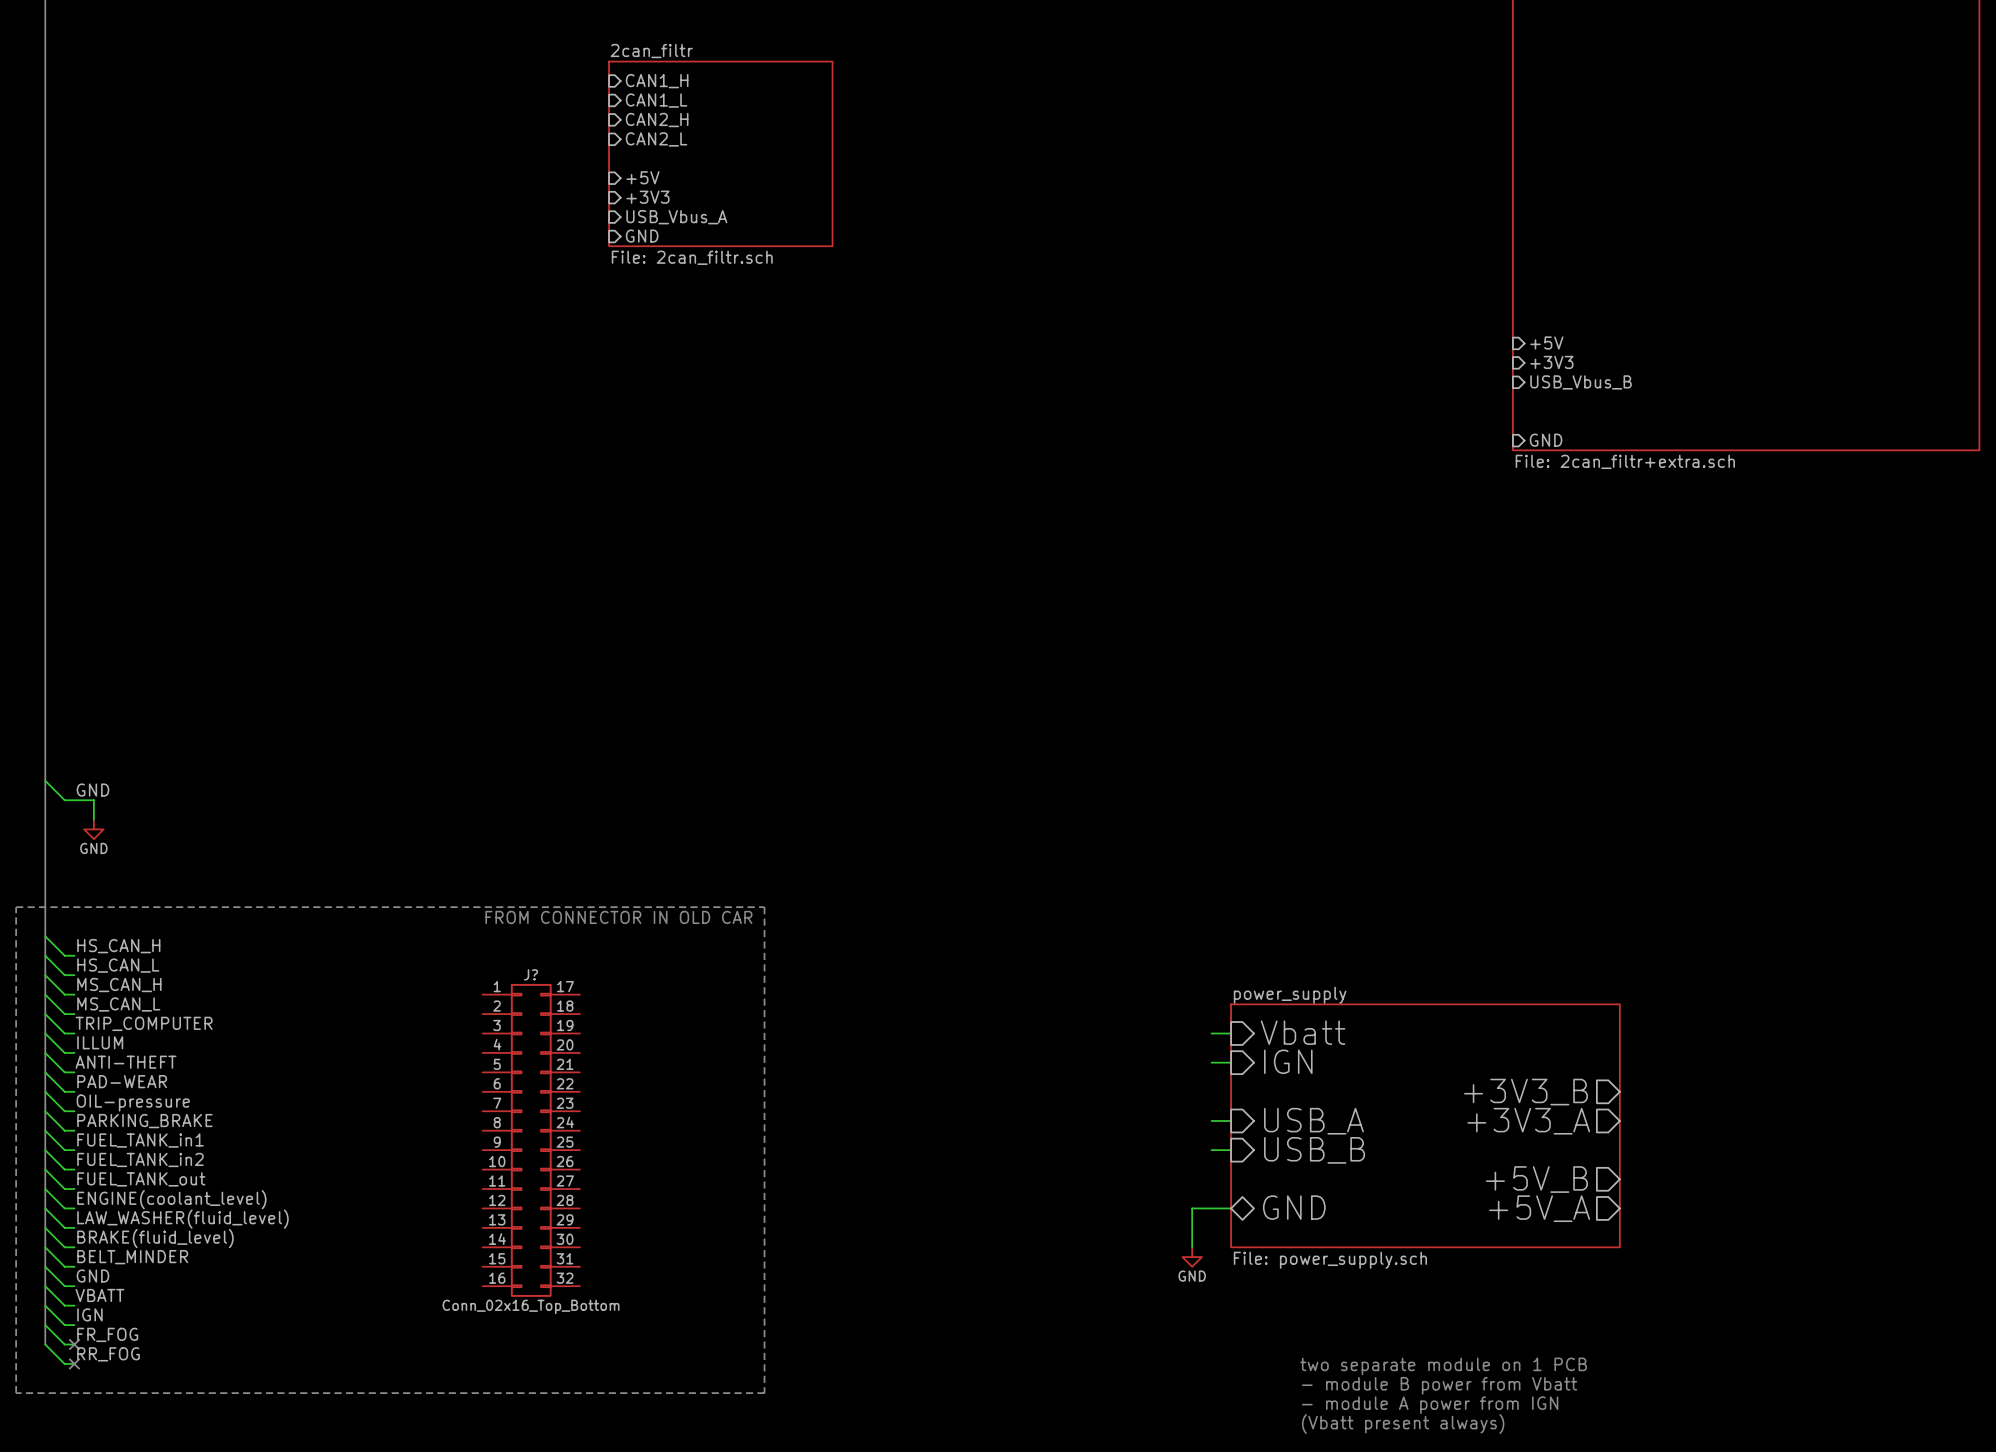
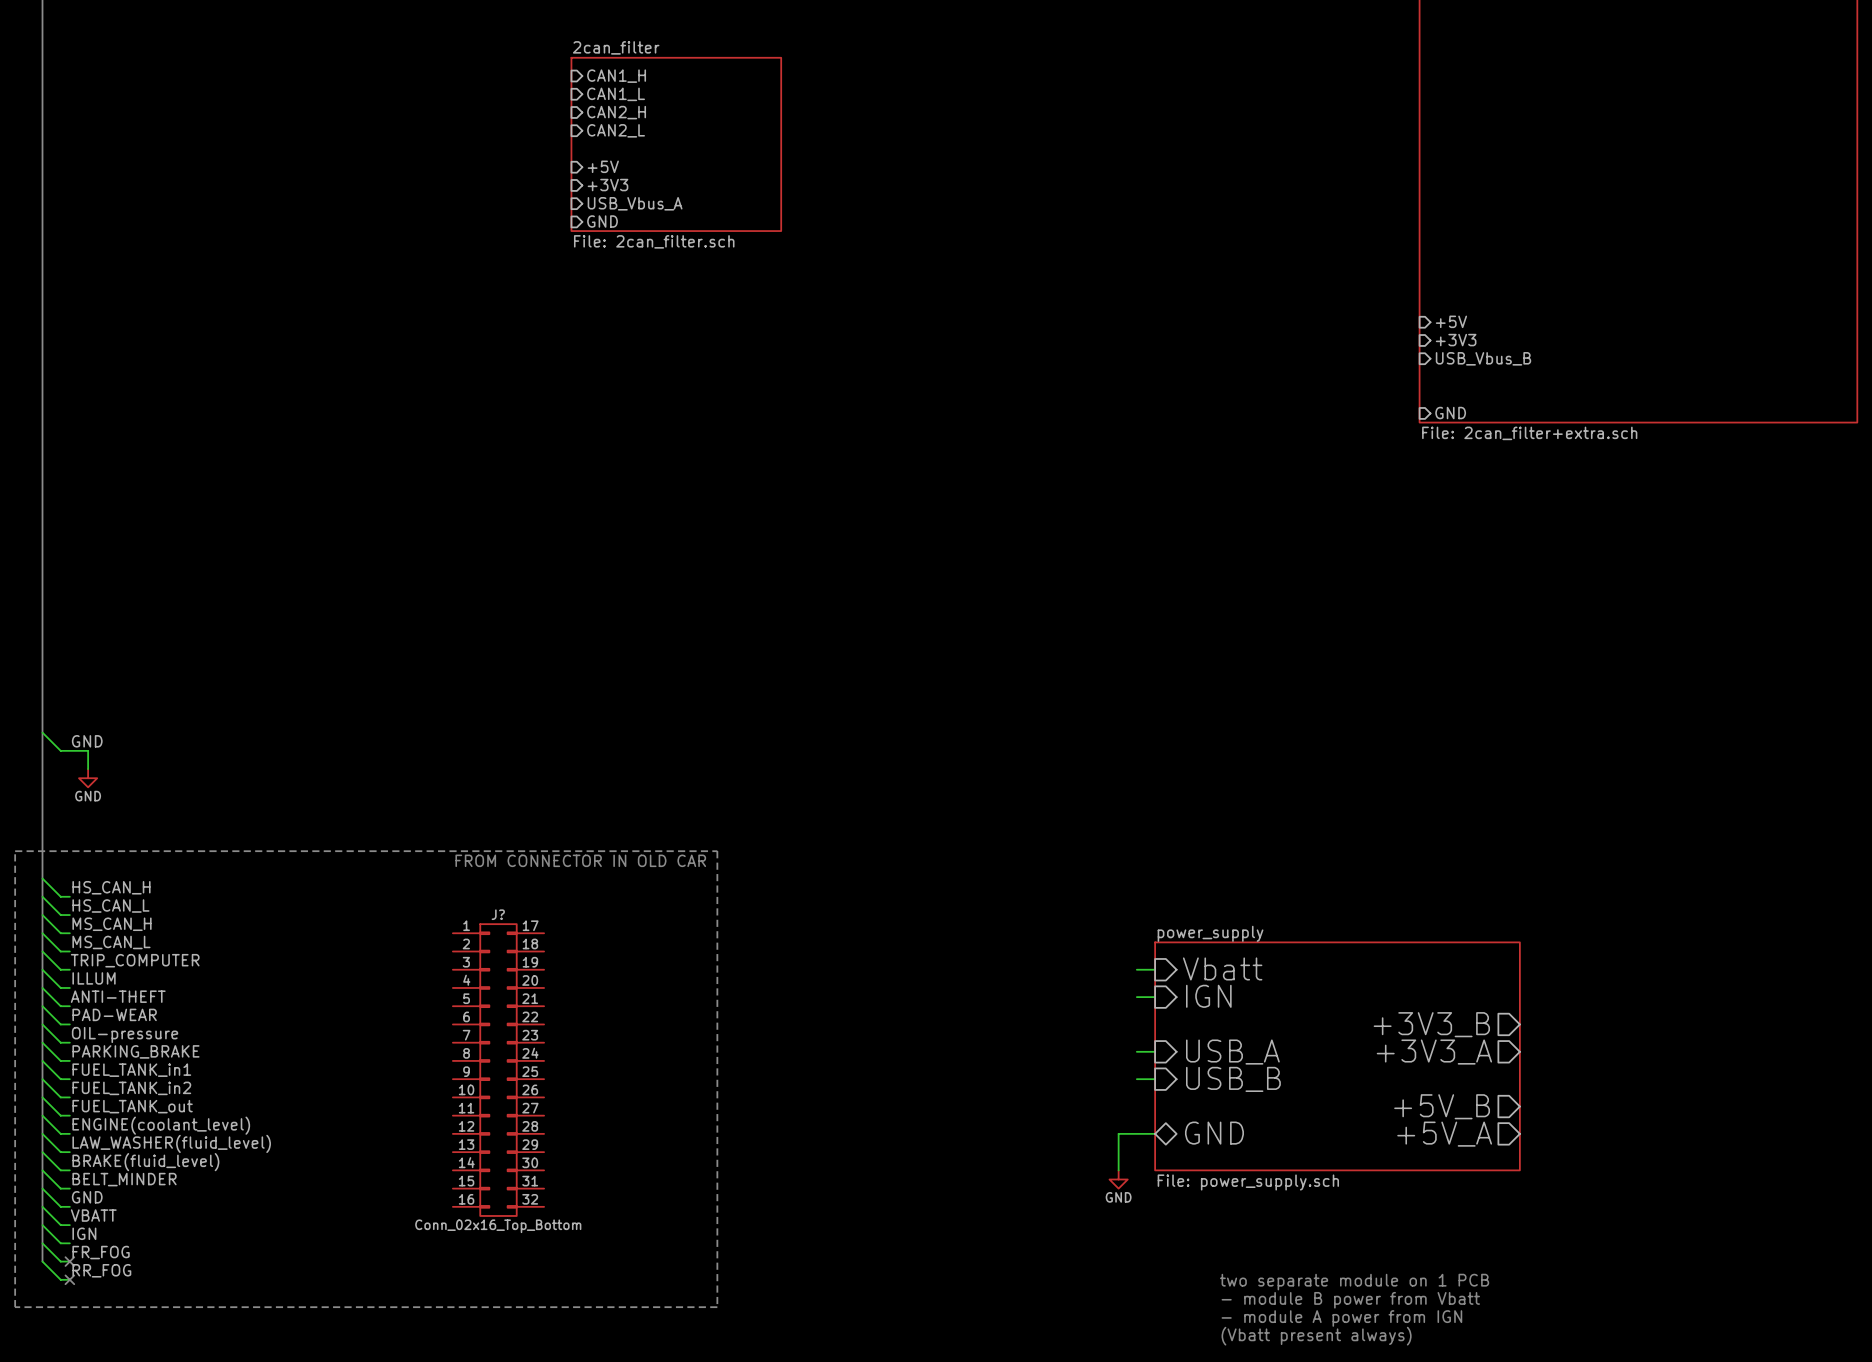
sheet 2can_filtr name: 2can_filtr (651, 51) -> 2can_filter (616, 47)
sheet 2can_filtr value: File: 2can_filtr.sch (692, 257) -> File: 2can_filter.sch (654, 241)
sheet value: File: 2can_filtr+extra.sch (1625, 461) -> File: 2can_filter+extra.sch (1529, 433)

